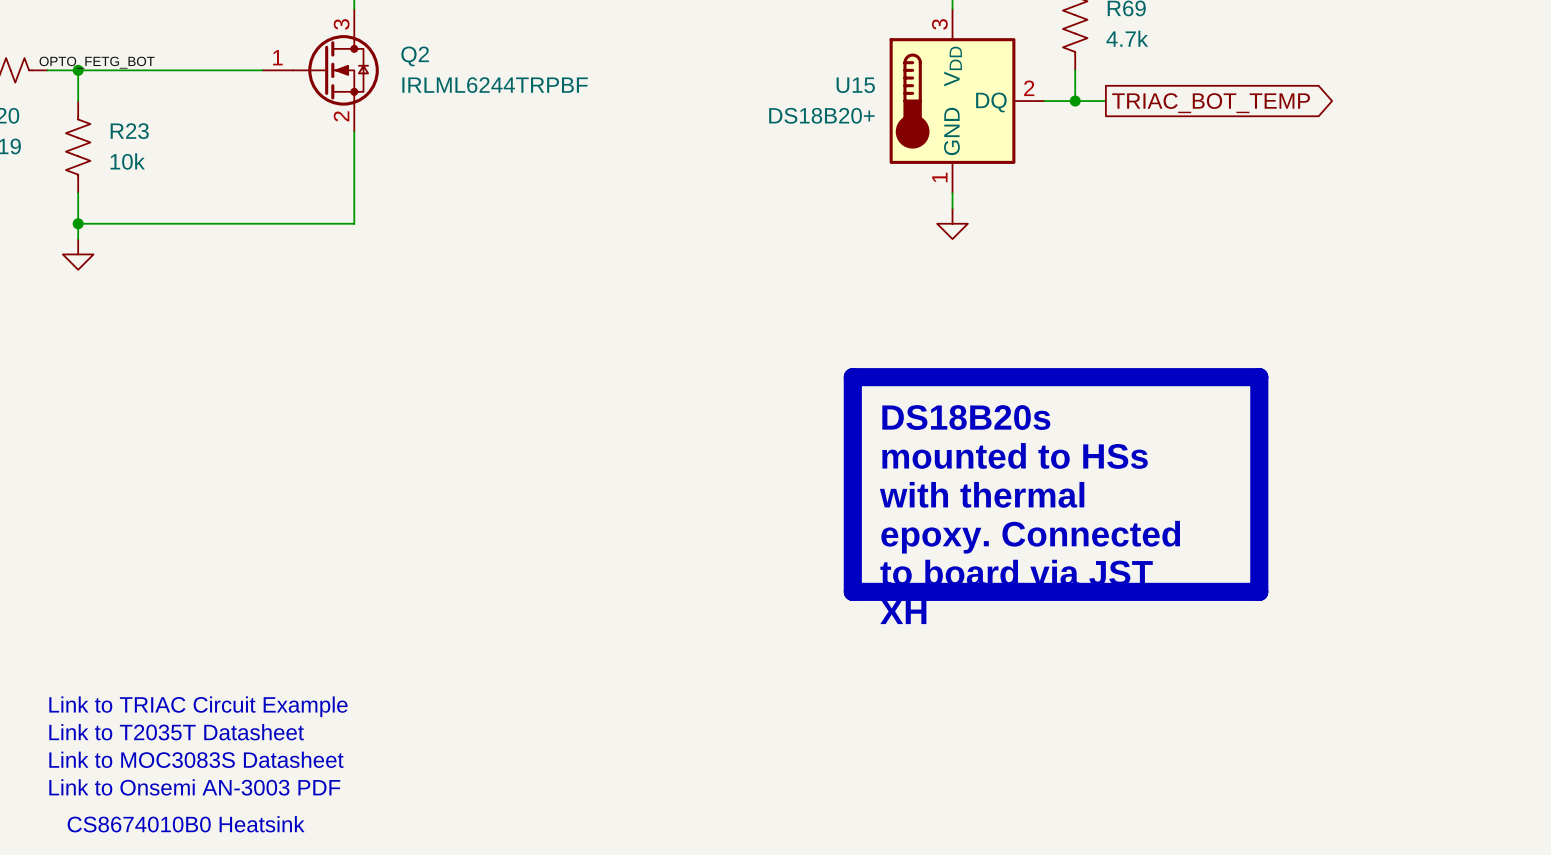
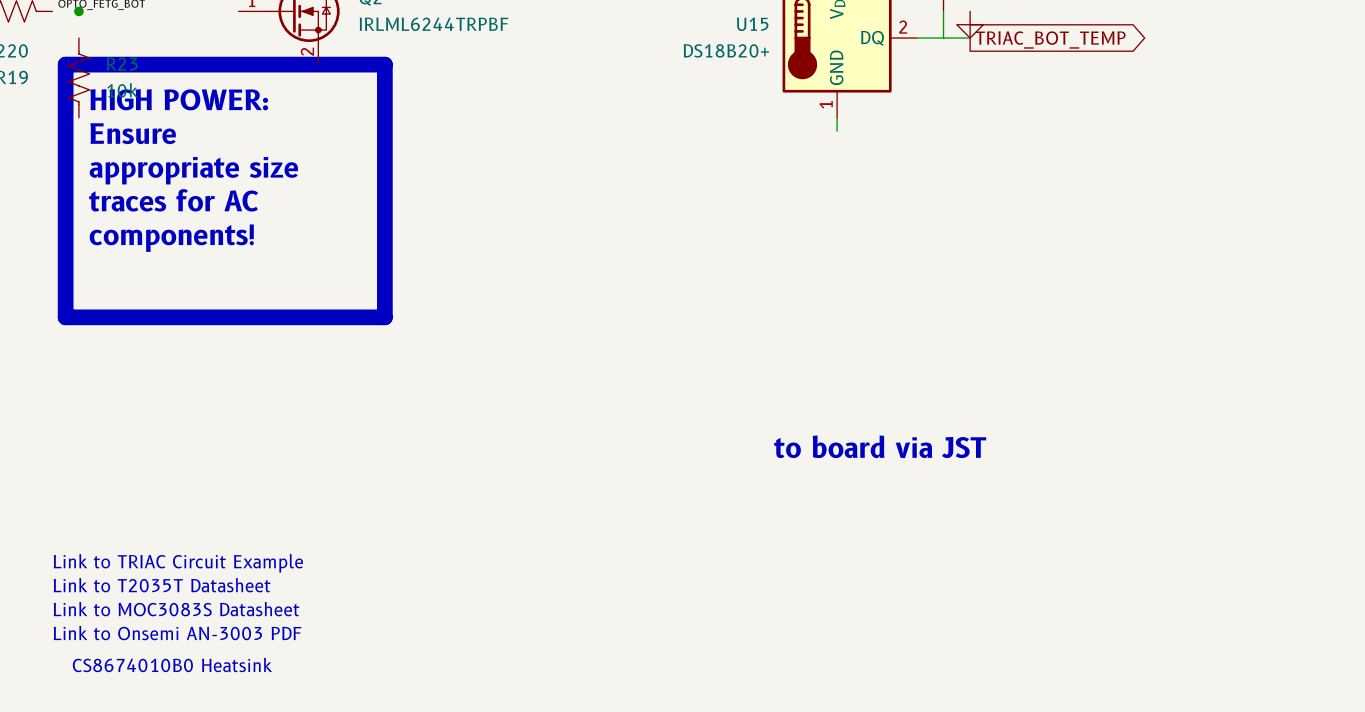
wire: (47, 70) (262, 70) -> none
wire: (78, 70) (78, 101) -> none
junction: (1075, 101) -> none
line: none -> (65, 64) (384, 64) (384, 317) (65, 317) (65, 64)
wire: (354, 131) (354, 223) (78, 223) -> none
text: none -> HIGH POWER: (179, 99)
wire: (78, 193) (78, 239) -> none
text: none -> Ensure (133, 133)
junction: (78, 223) -> none
power symbol position: (952, 223) -> (970, 24)
text: none -> appropriate size (193, 170)
power symbol: (78, 254) -> none
text: none -> traces for AC (173, 200)
text: none -> components! (171, 238)
line: (852, 377) (1259, 377) (1259, 591) (852, 591) (852, 377) -> none
text: DS18B20s (966, 417) -> none
text: mounted to HSs (1015, 455) -> none
text: with thermal (982, 494) -> none
text: epoxy. Connected (1030, 537) -> none
text: XH (903, 612) -> none

